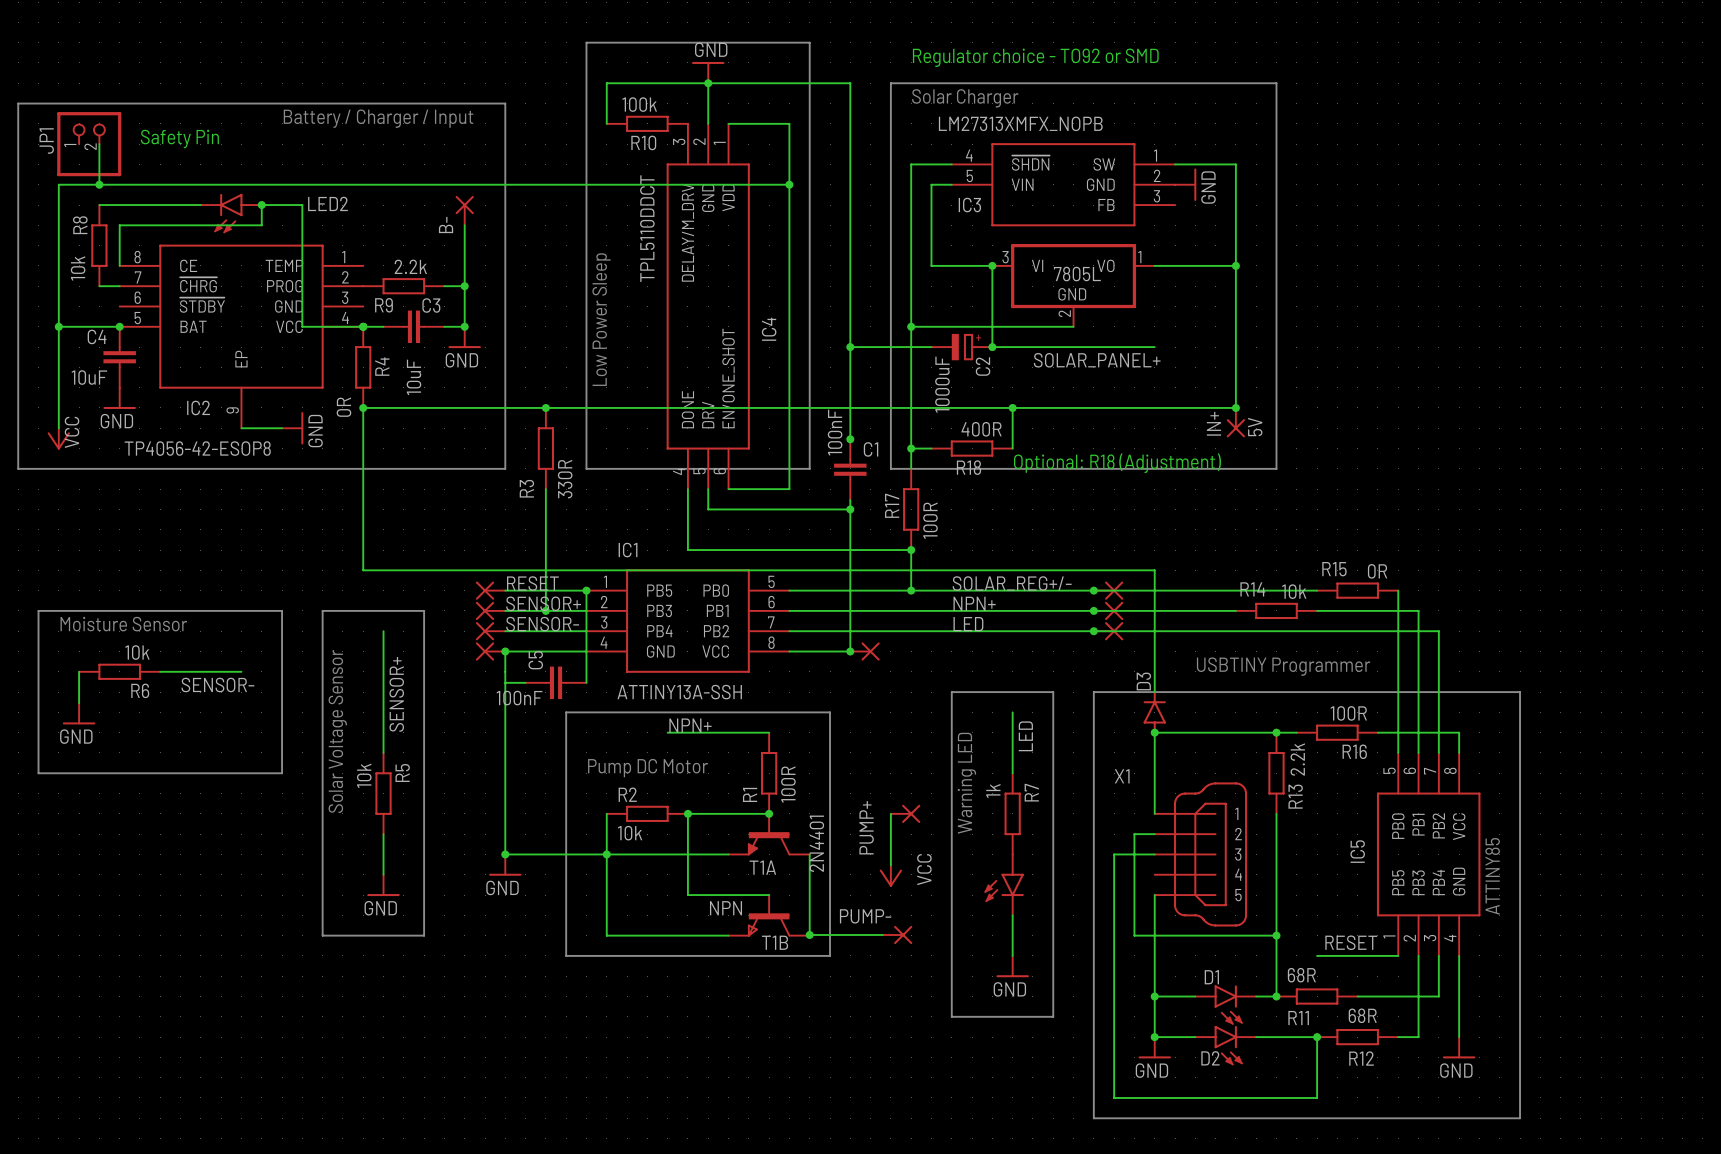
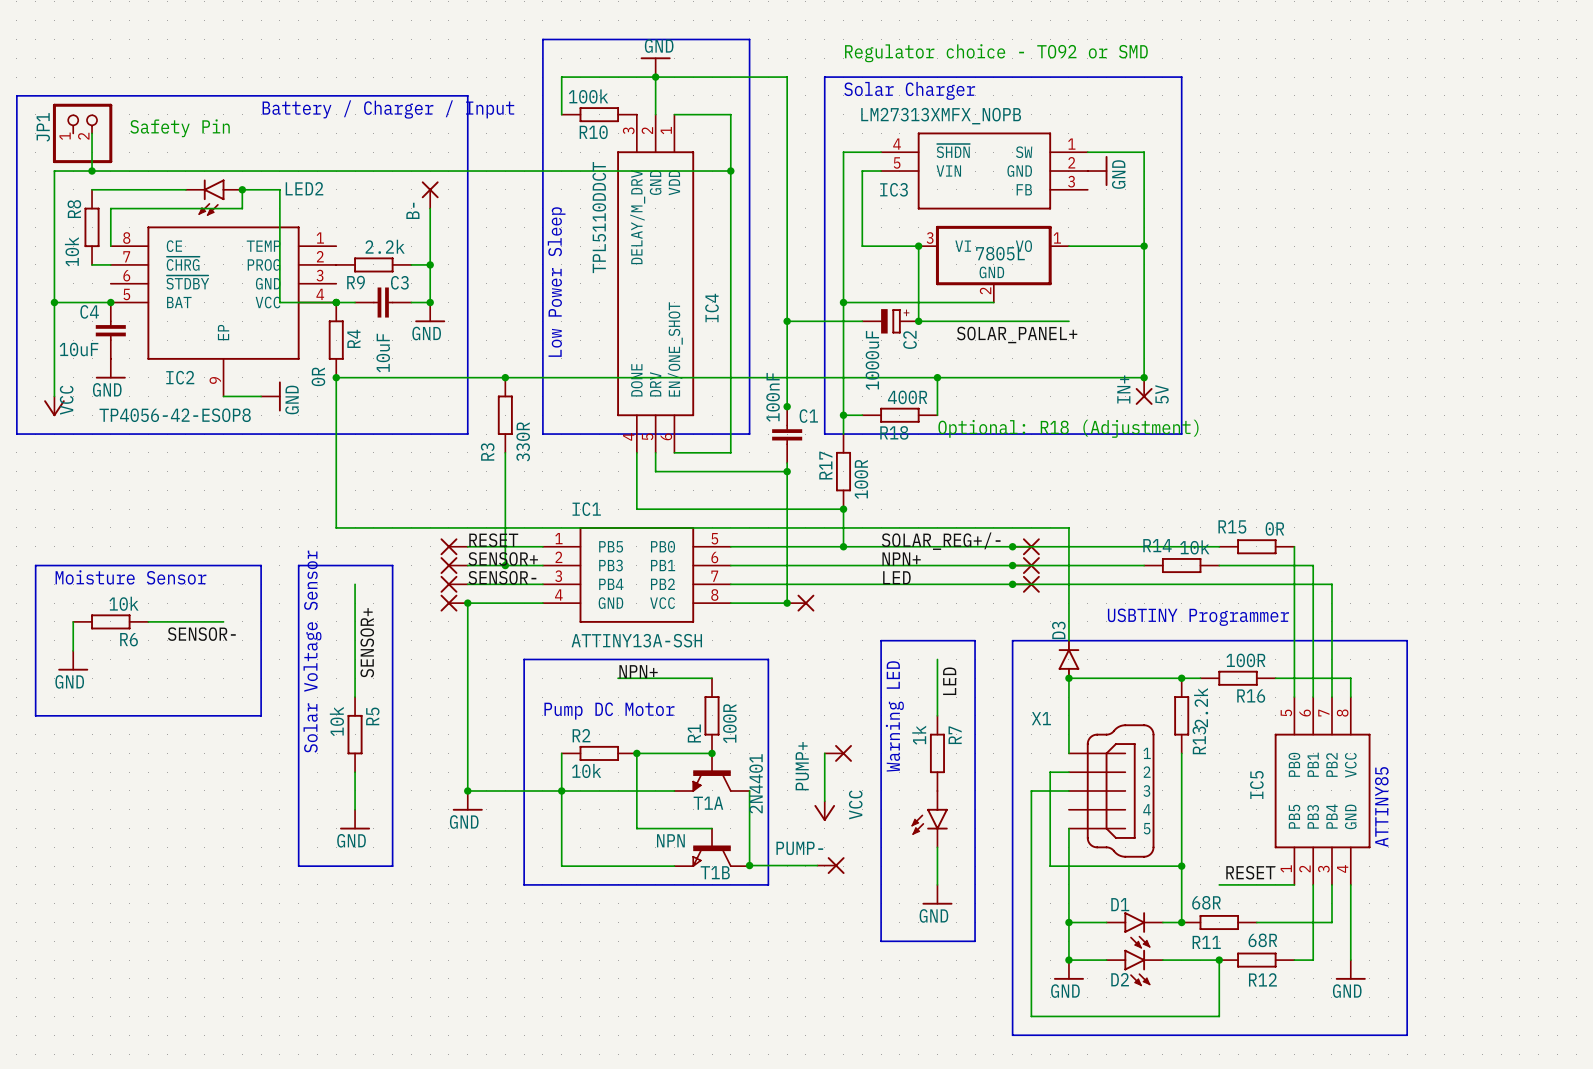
wire: (586, 590) (586, 682) -> none
junction: (586, 590) -> none
wire: (505, 682) (525, 682) -> none
C5: 100nF (556, 682) -> none

